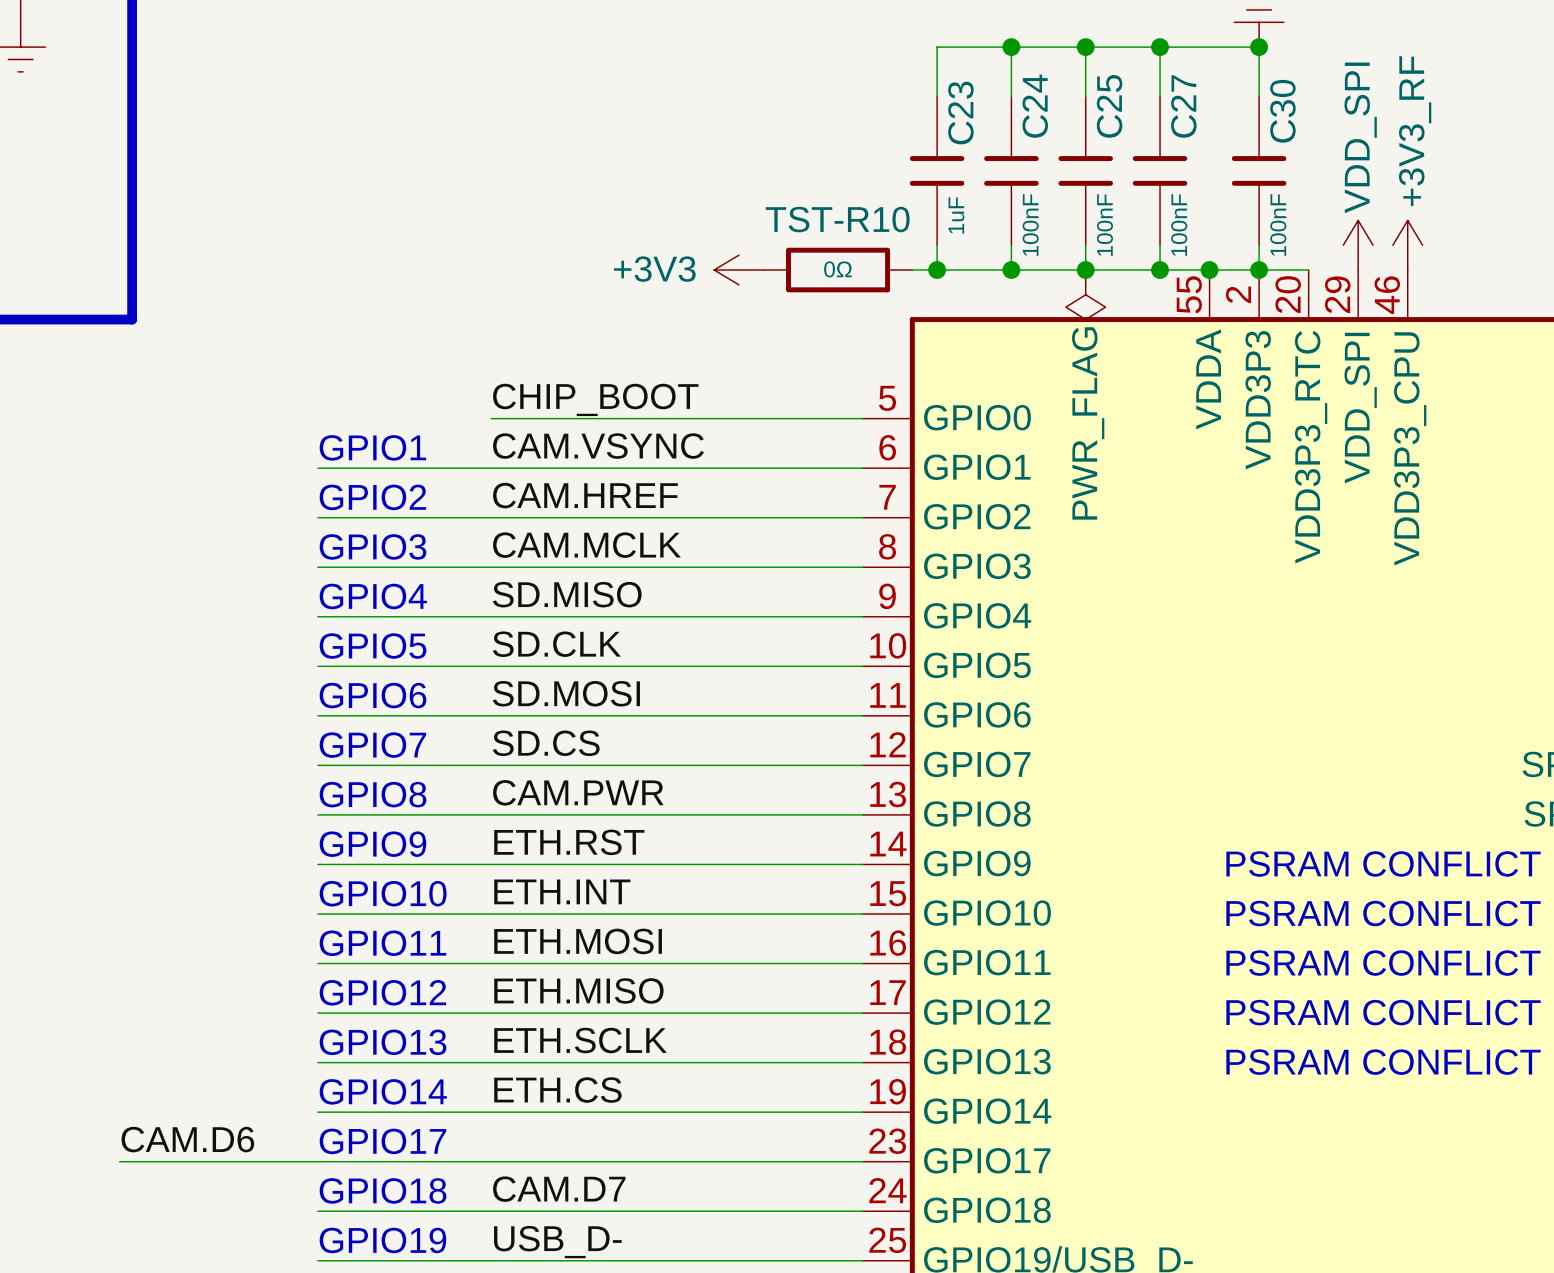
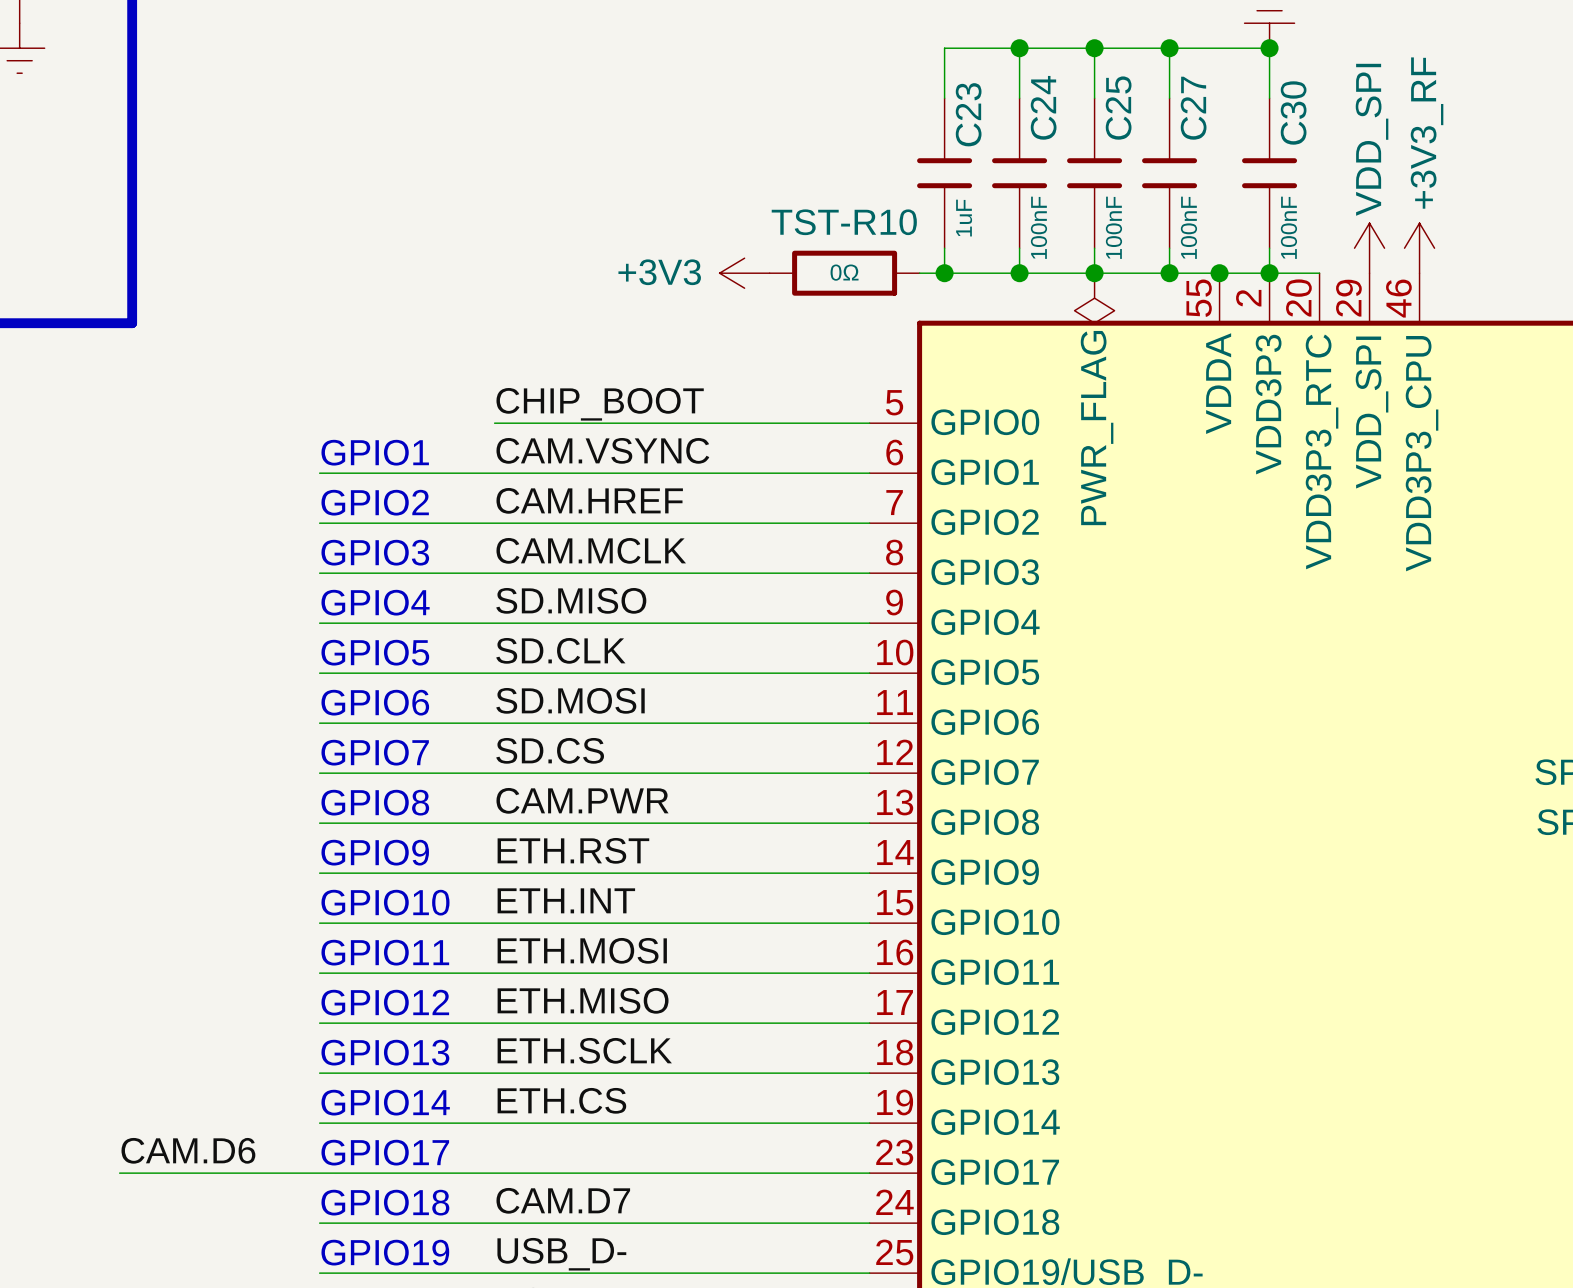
text: PSRAM CONFLICT (1383, 863) -> none
text: PSRAM CONFLICT (1383, 913) -> none
text: PSRAM CONFLICT (1383, 963) -> none
text: PSRAM CONFLICT (1383, 1012) -> none
text: PSRAM CONFLICT (1383, 1062) -> none

